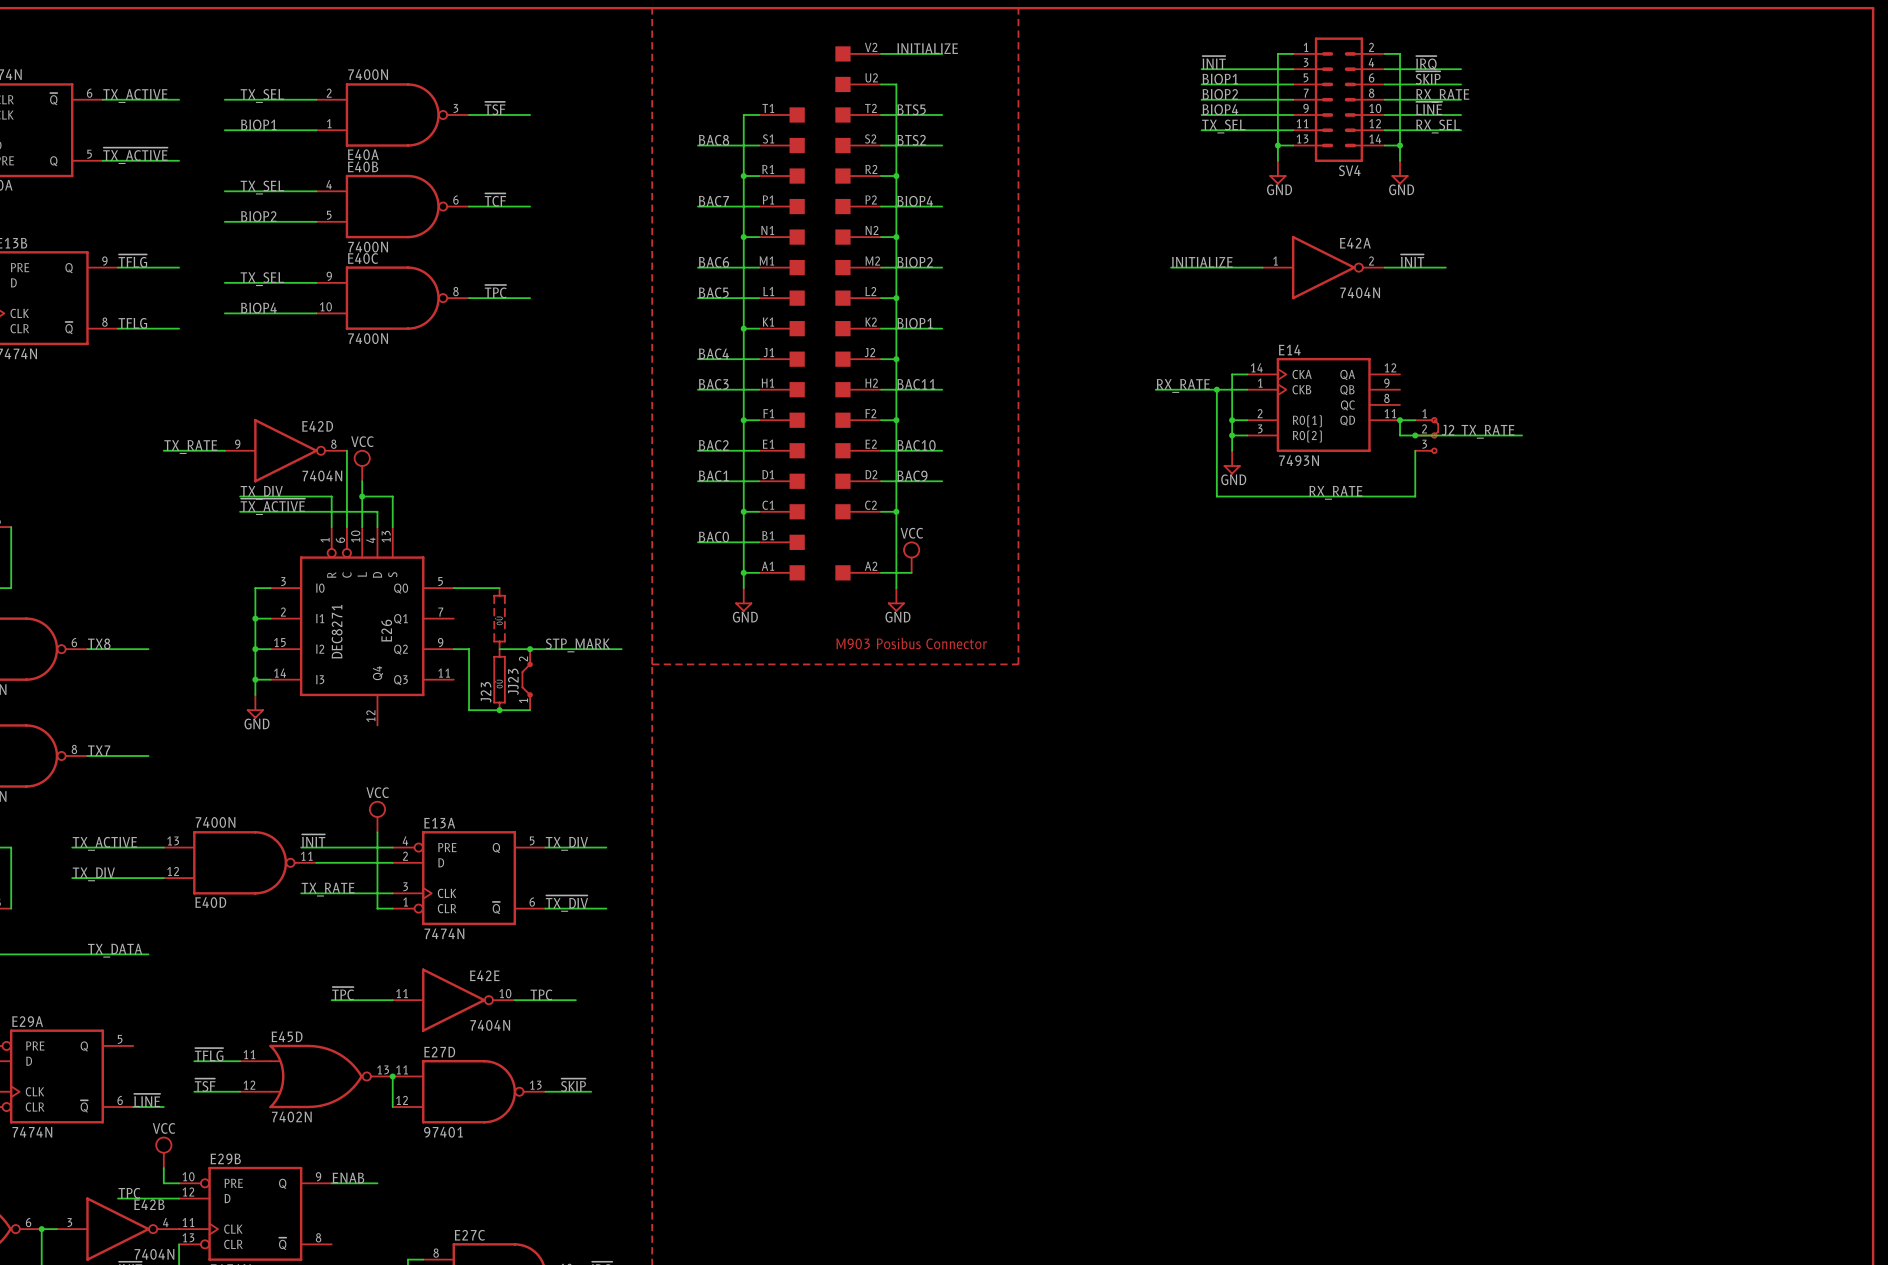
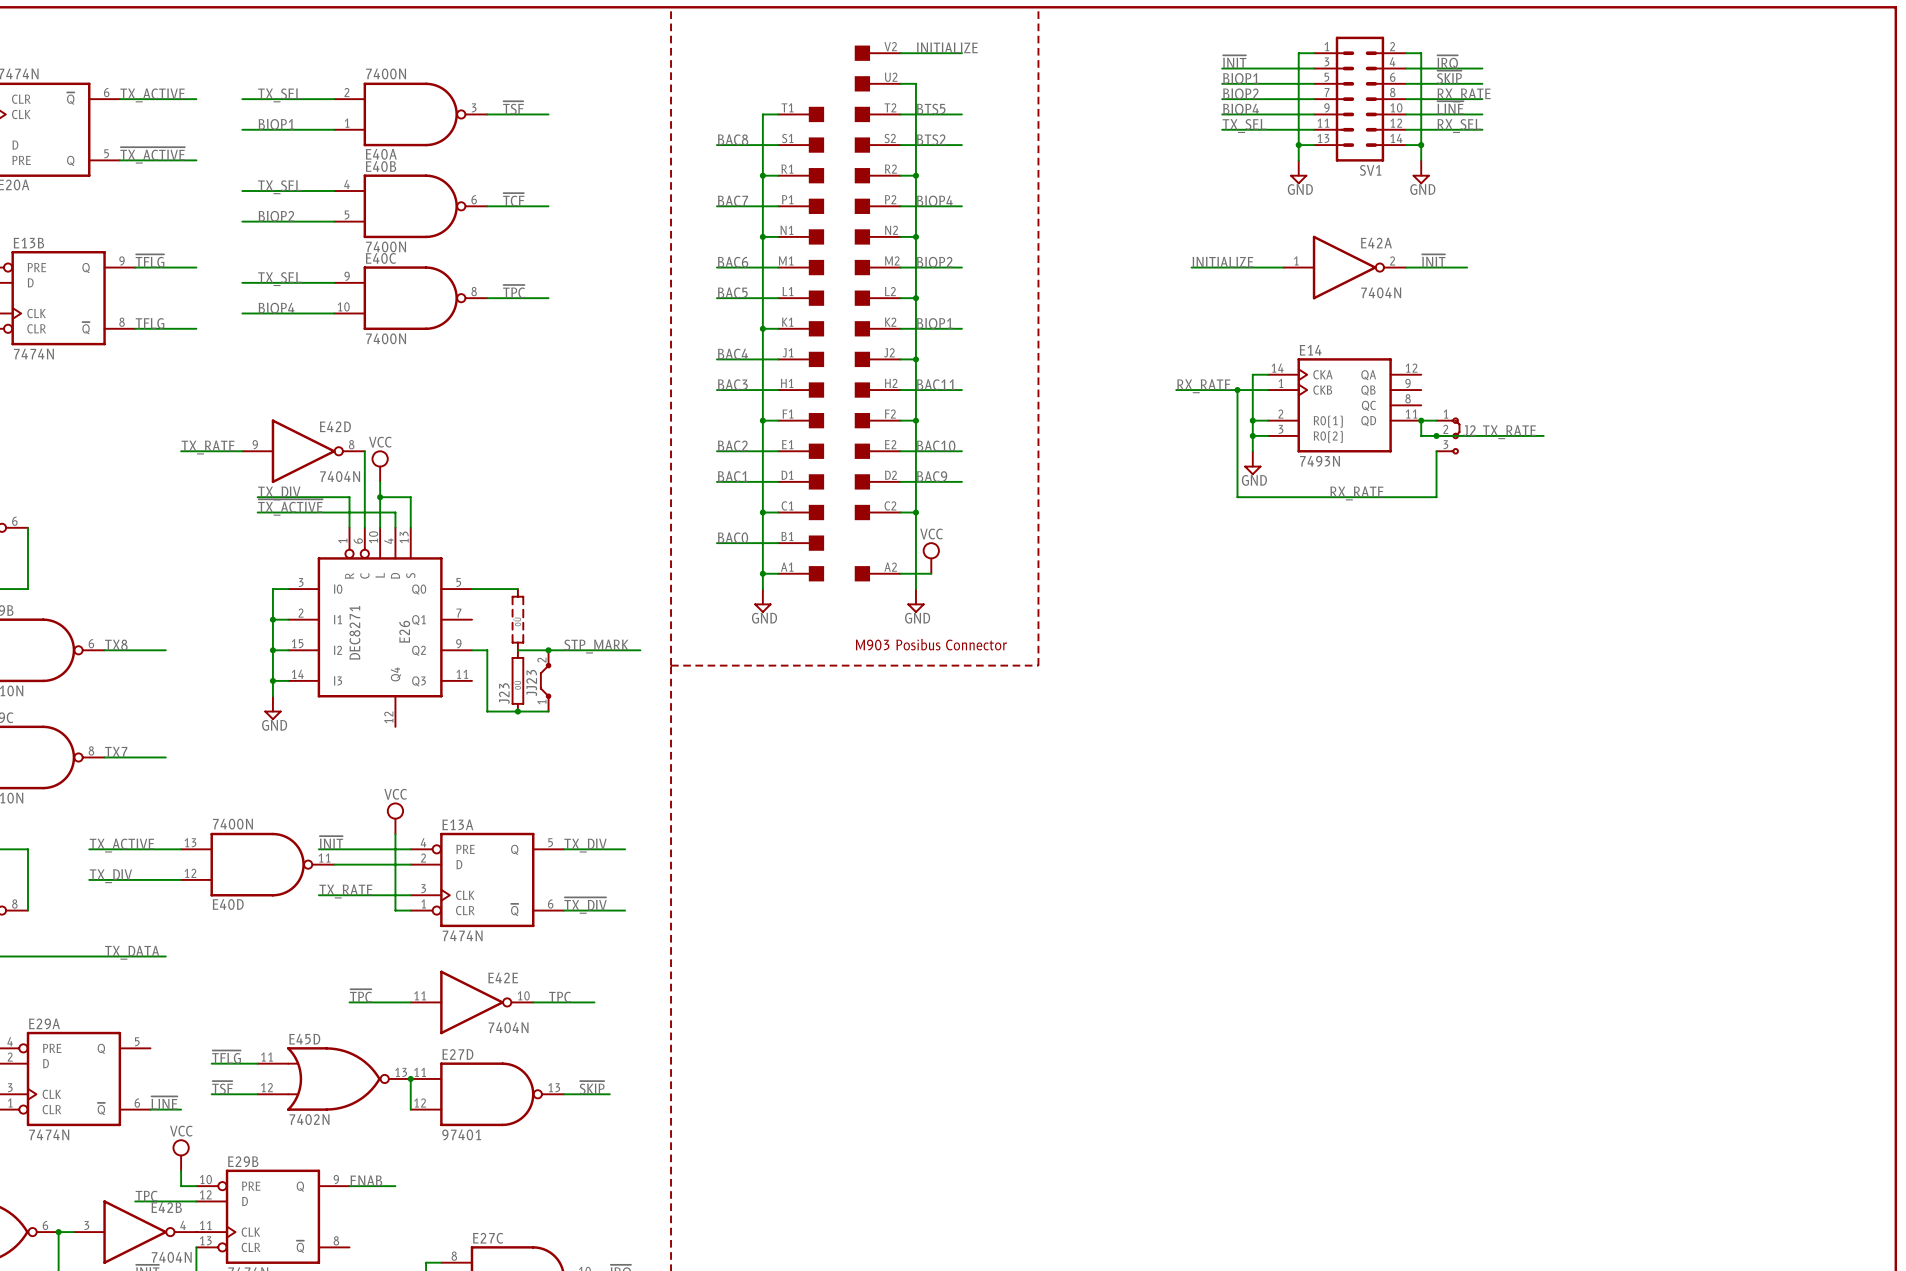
SV4 name: SV4 (1349, 170) -> SV1 (1370, 170)

